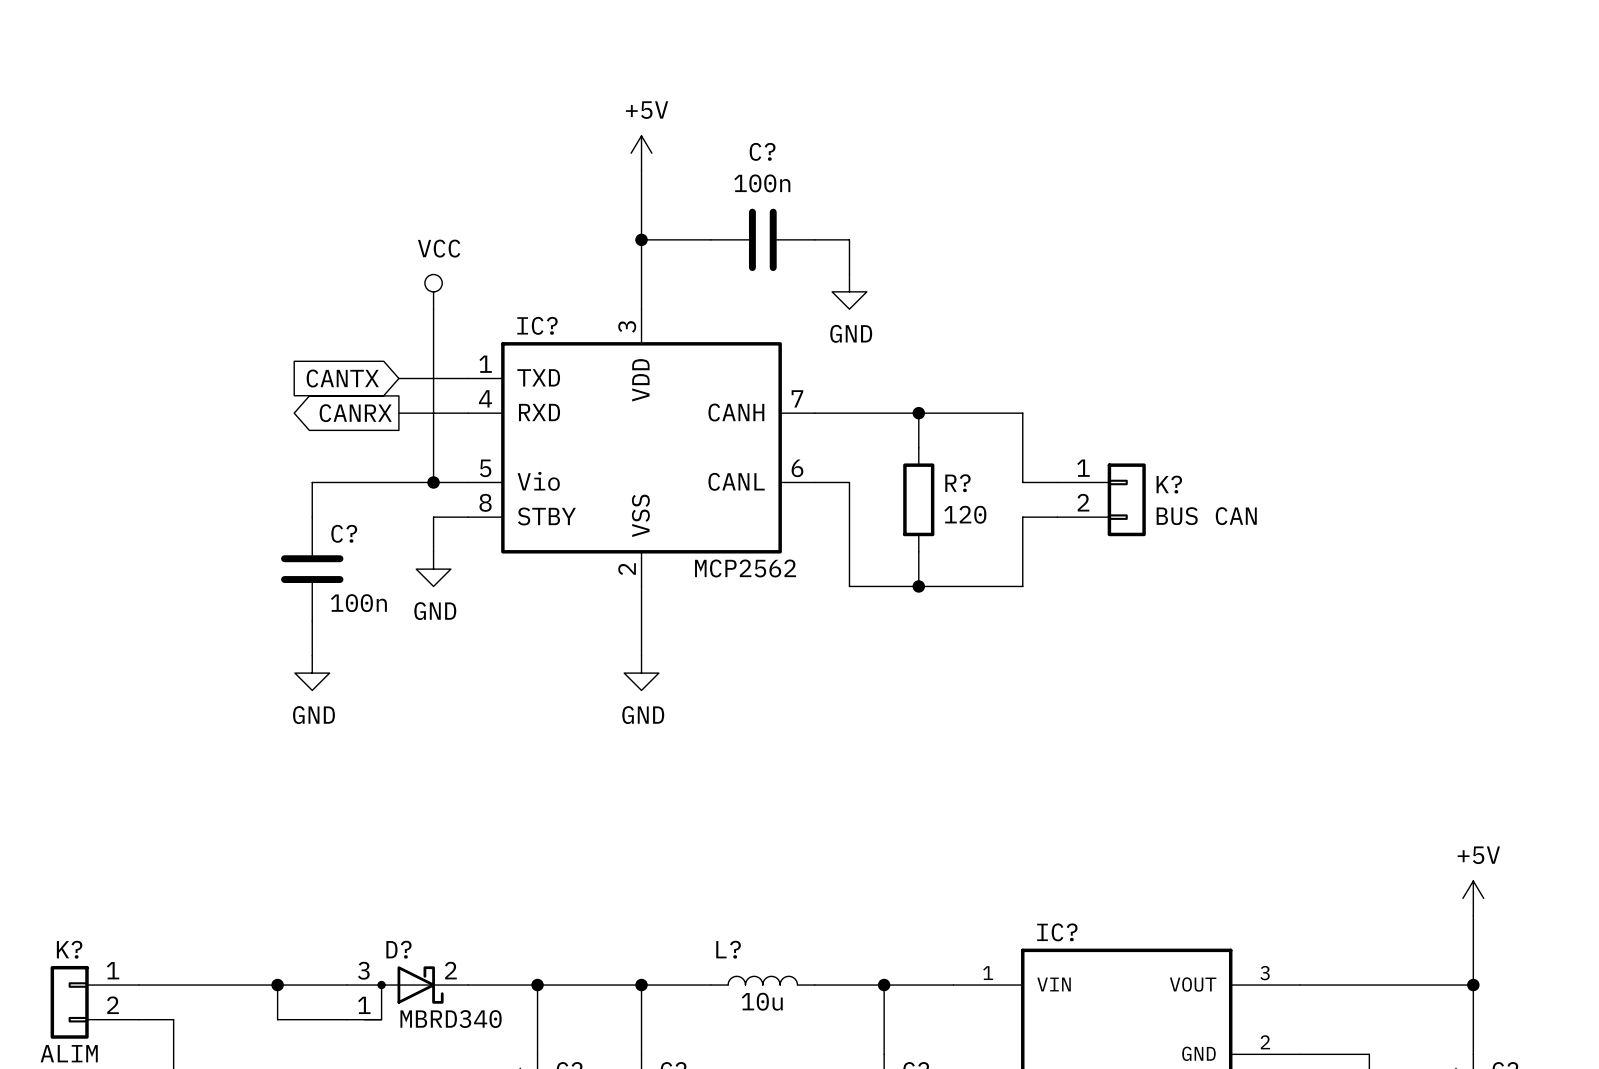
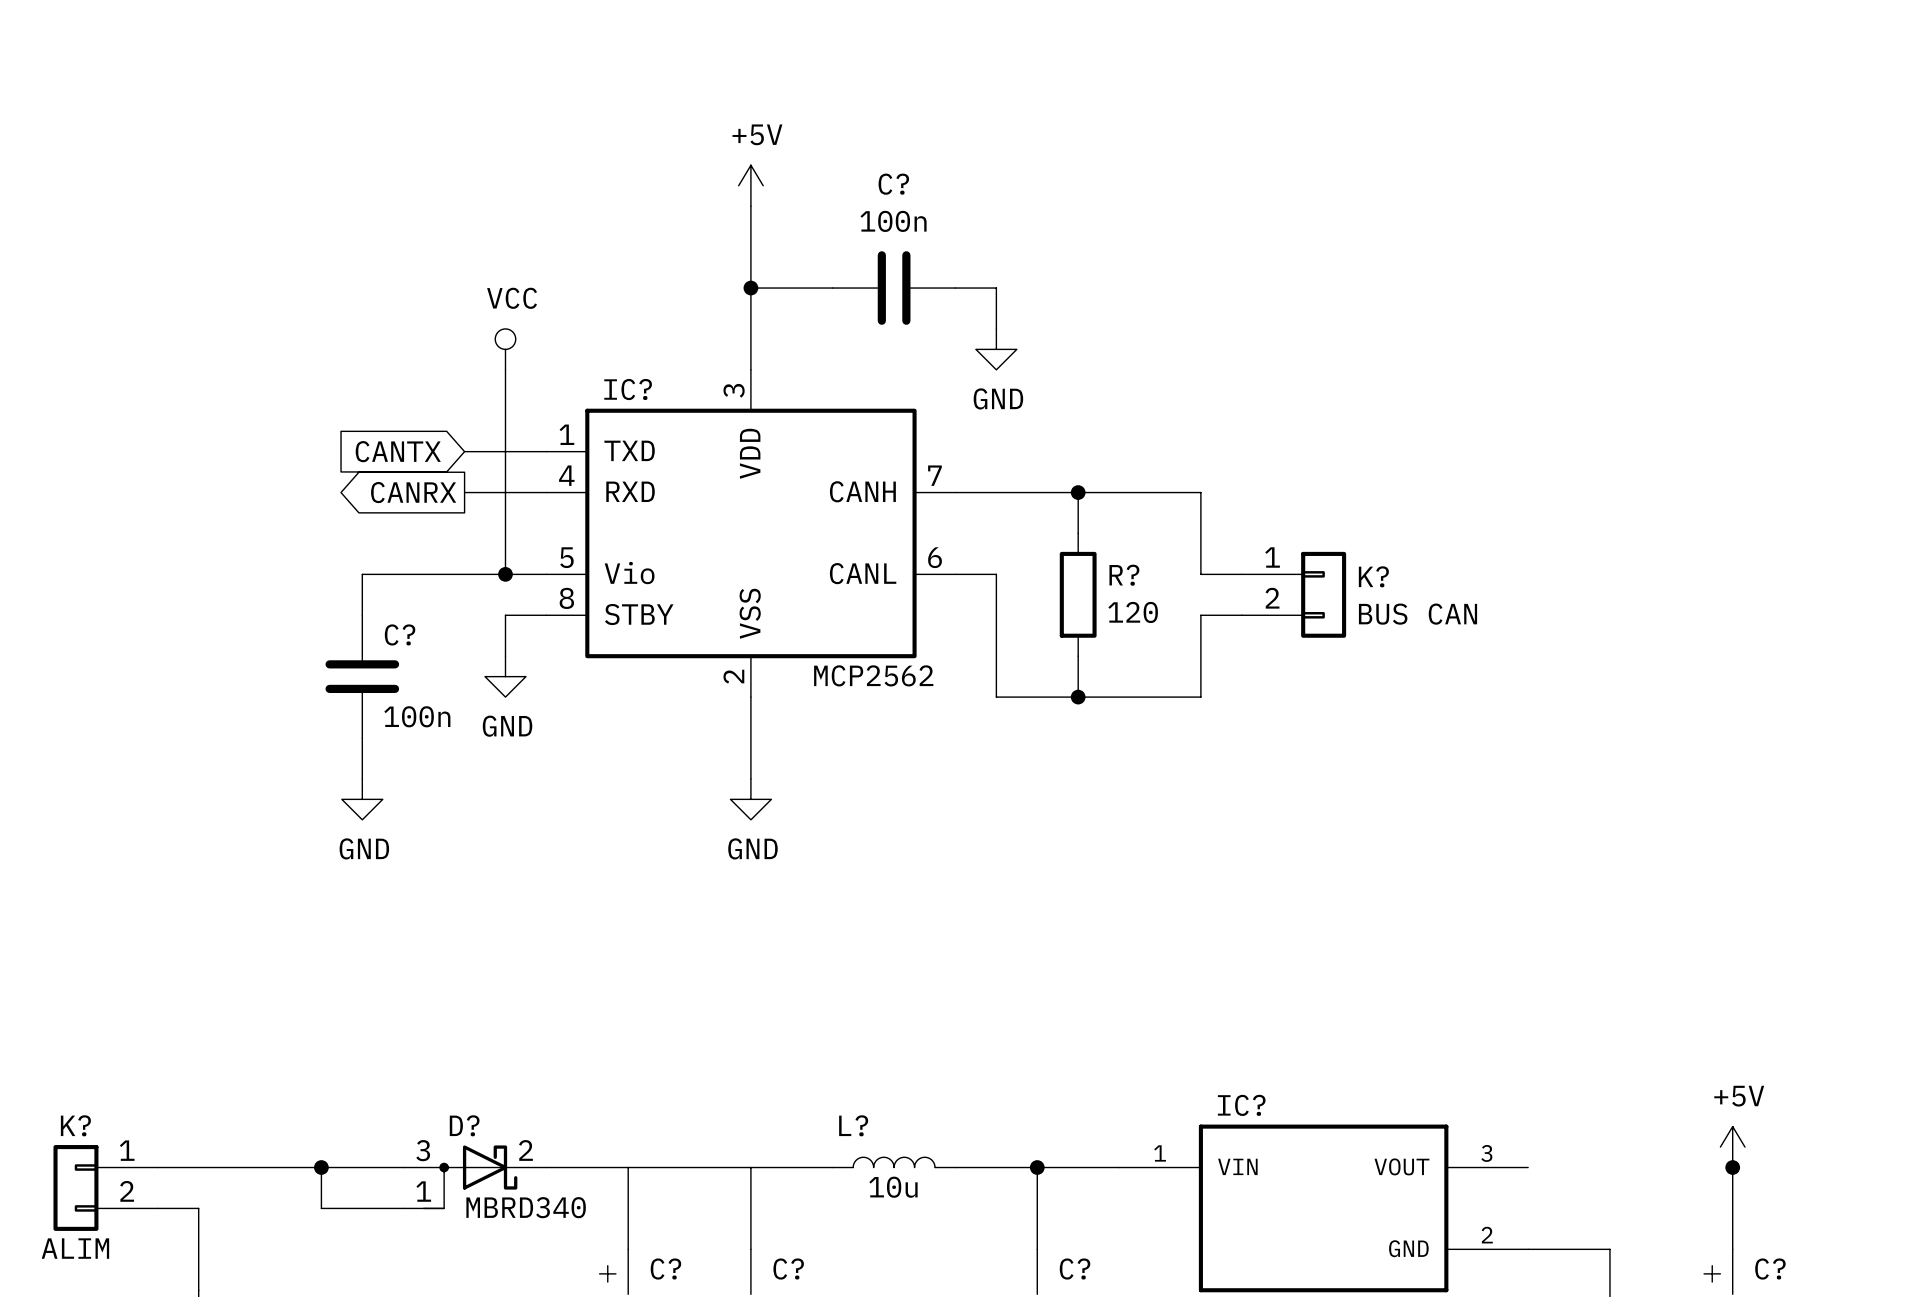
power symbol position: +5V (1473, 898) -> +5V (1732, 1147)
wire: (1473, 915) (1473, 985) (1300, 985) -> none
junction: (537, 985) -> none
junction: (641, 985) -> none

